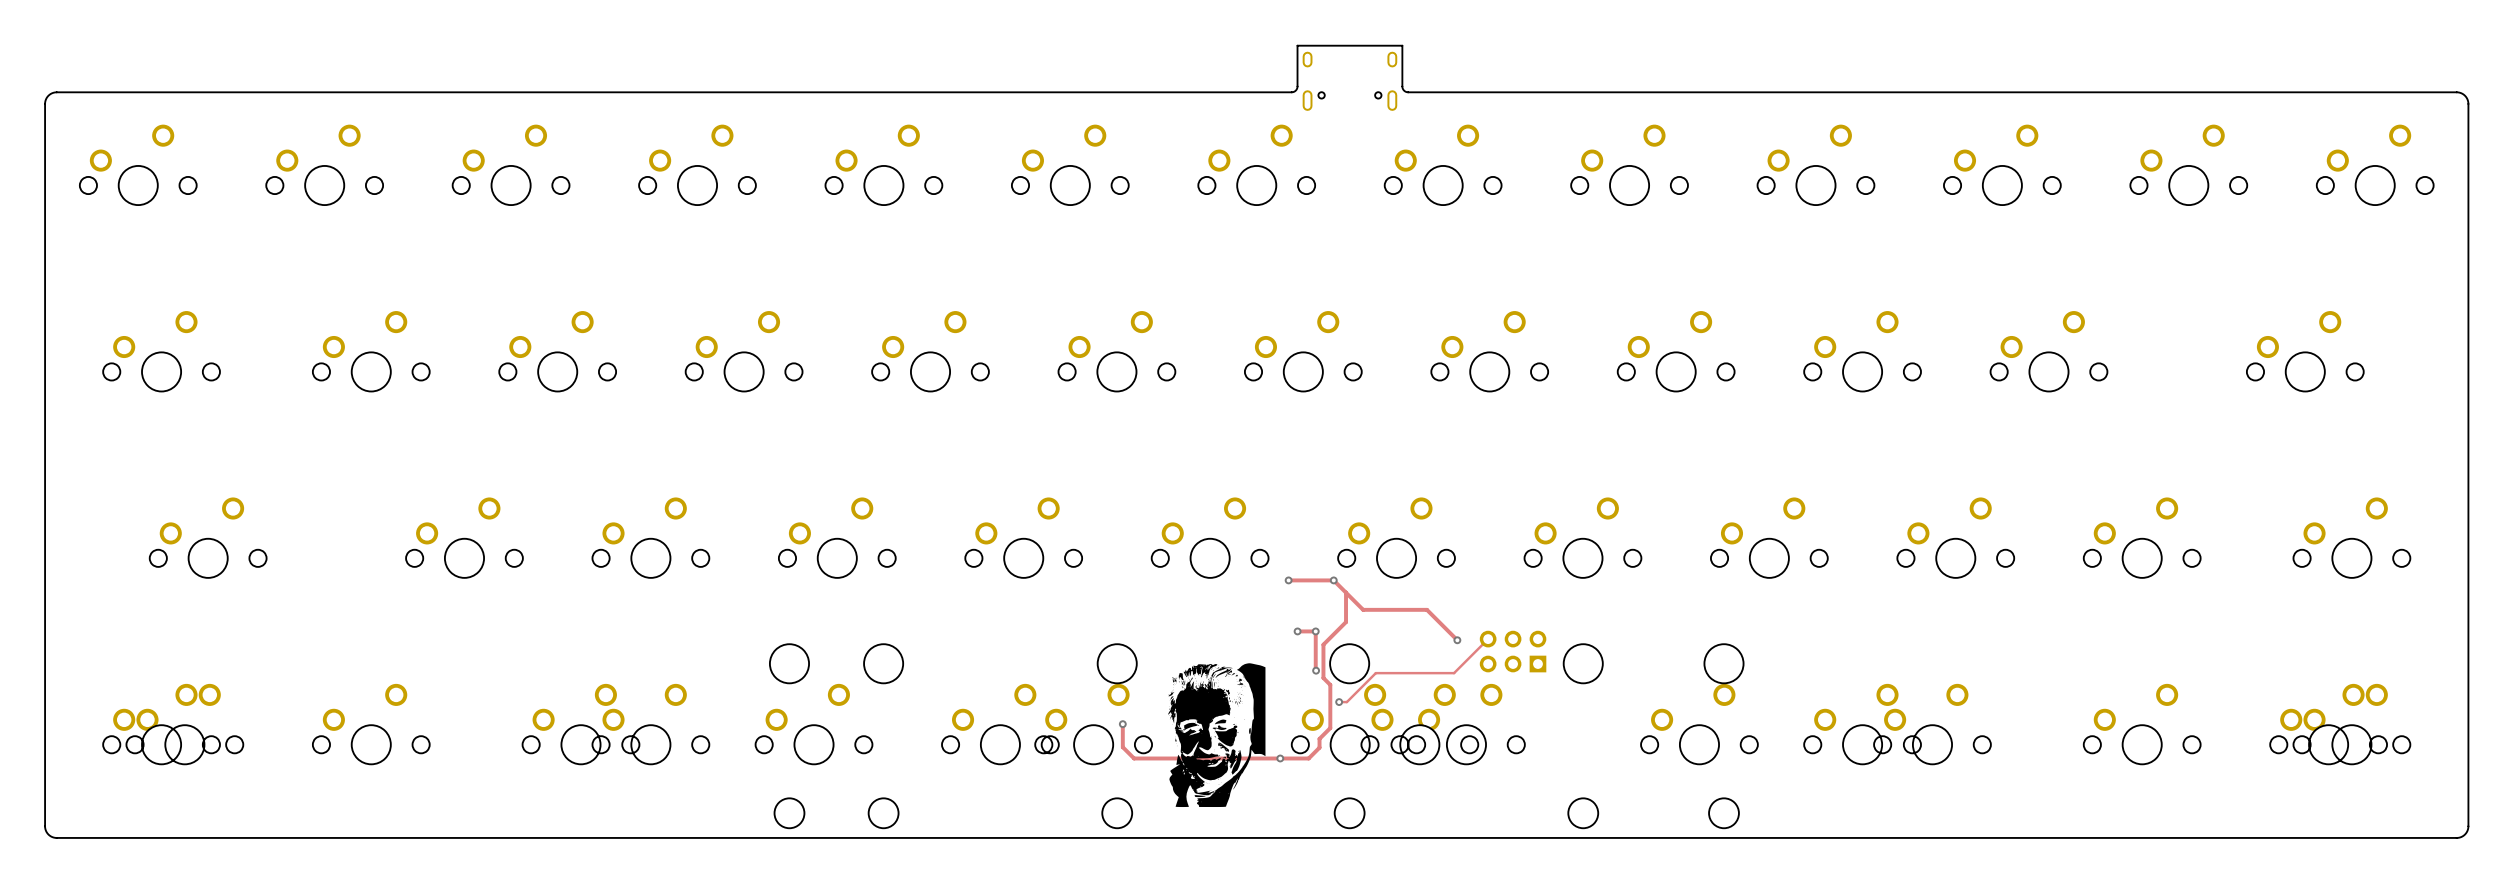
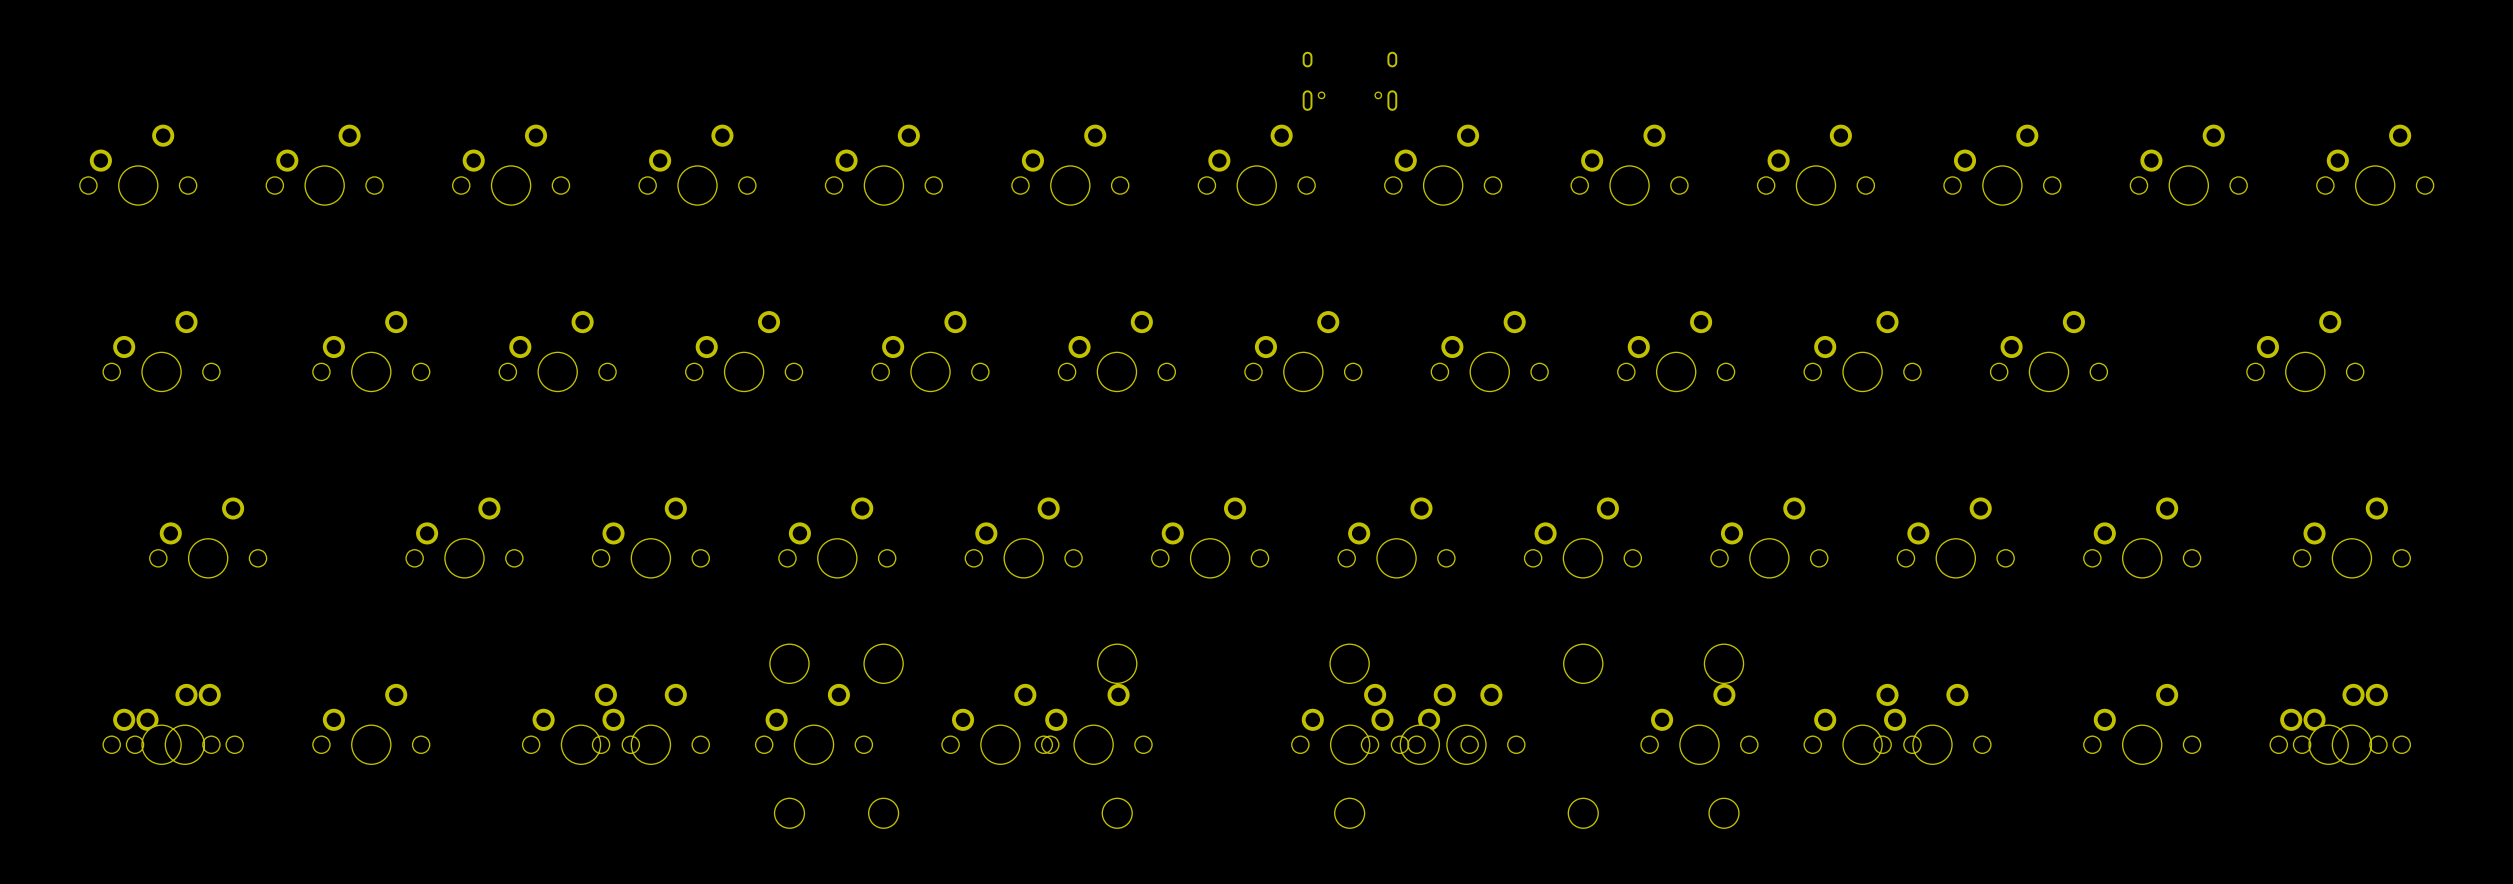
board edge: (1297, 45) (1402, 45) (1402, 87) (1408, 92) (2456, 92) (2463, 94) (2468, 103) (2468, 826) (2466, 833) (2456, 837) (56, 837) (50, 836) (46, 832) (45, 826) (45, 103) (46, 98) (50, 93) (56, 92) (1291, 92) (1297, 87) (1297, 45) -> none
track: (1288, 580) (1333, 580) (1363, 609) (1426, 609) (1457, 640) -> none
via: (1288, 580) -> none
via: (1333, 580) -> none
track: (1346, 592) (1346, 622) (1323, 644) (1323, 678) (1330, 684) (1330, 728) (1319, 738) (1319, 747) (1308, 758) (1134, 758) (1122, 747) (1122, 724) -> none
track: (1297, 631) (1315, 631) (1316, 670) -> none
via: (1297, 631) -> none
via: (1315, 631) -> none
track: (1488, 639) (1454, 673) (1375, 673) (1346, 702) (1339, 702) -> none
via: (1457, 640) -> none
part: (1513, 651) -> none
drawing: [1168, 663, 1266, 808] -> none
via: (1316, 670) -> none
via: (1339, 702) -> none
via: (1122, 724) -> none
via: (1280, 758) -> none

